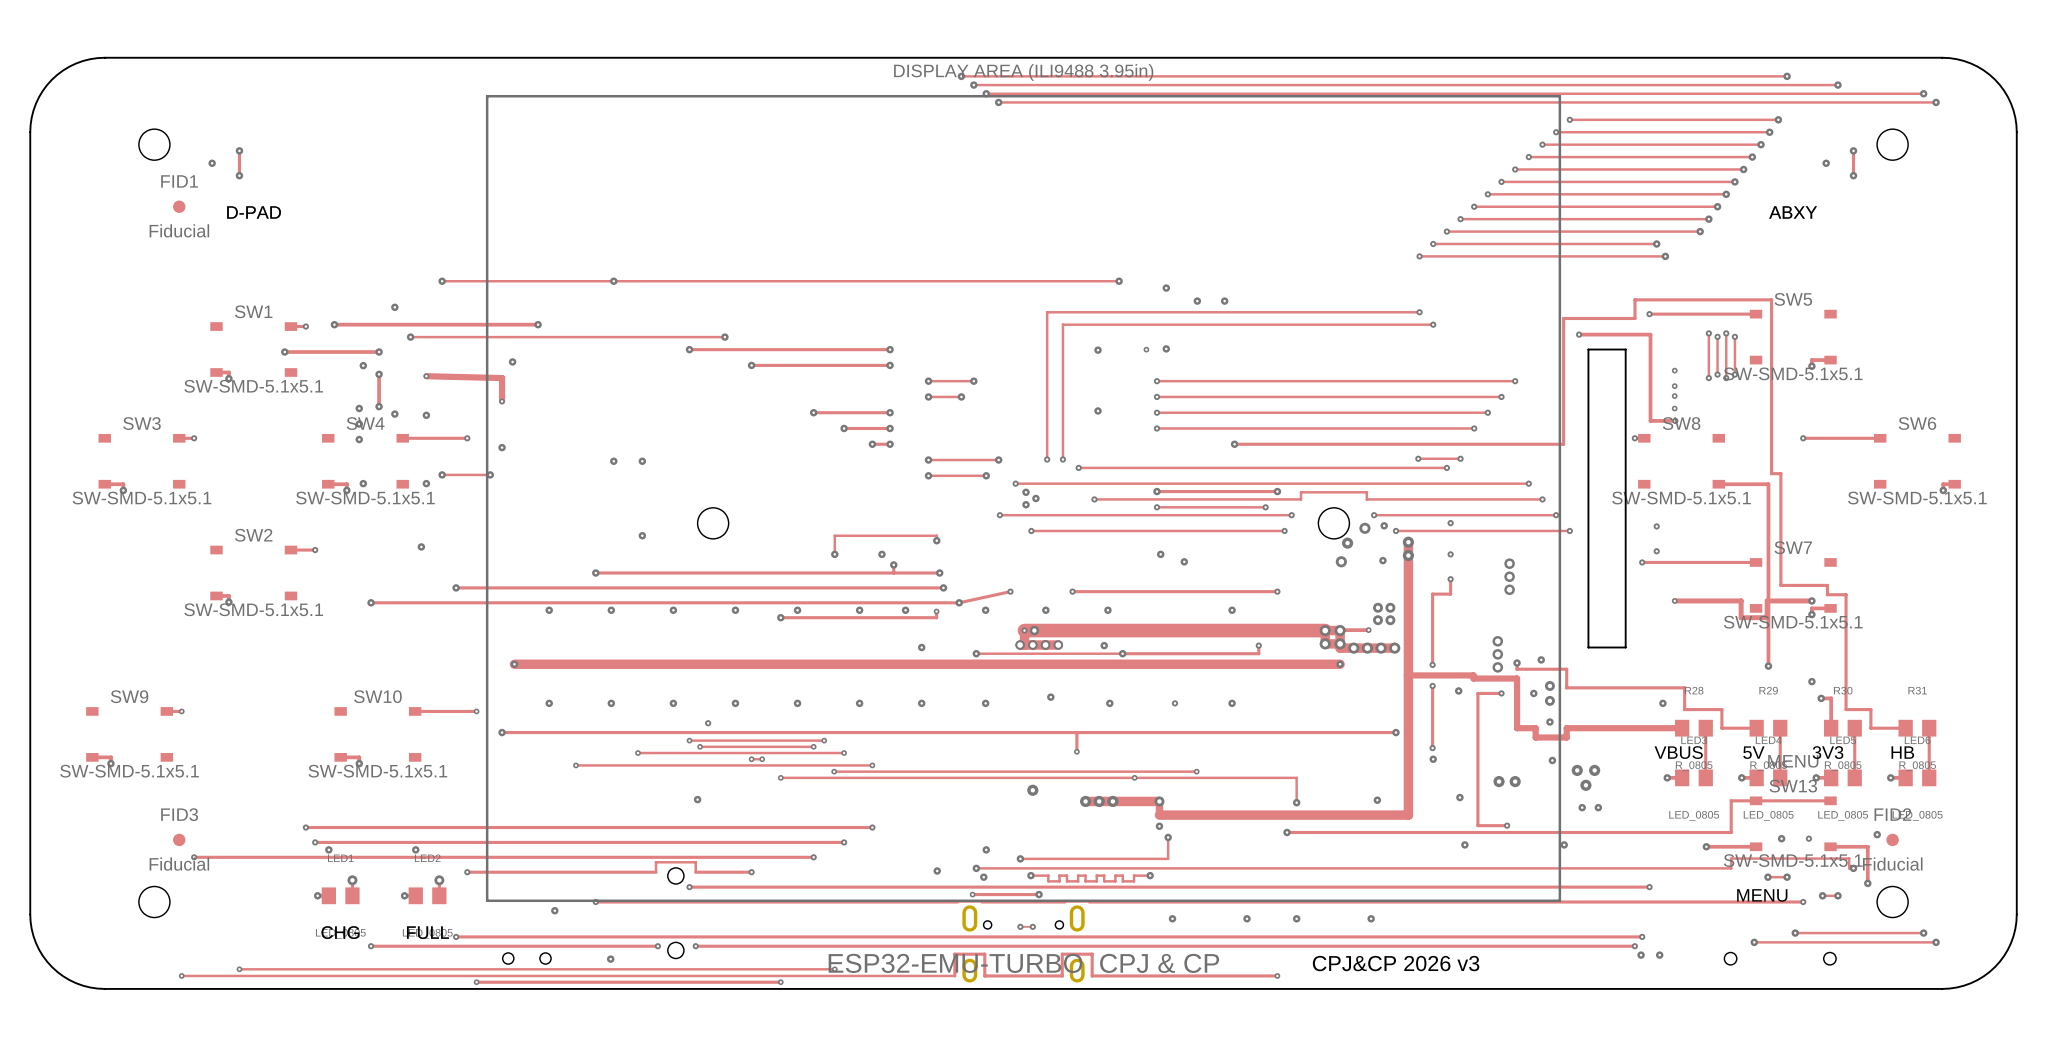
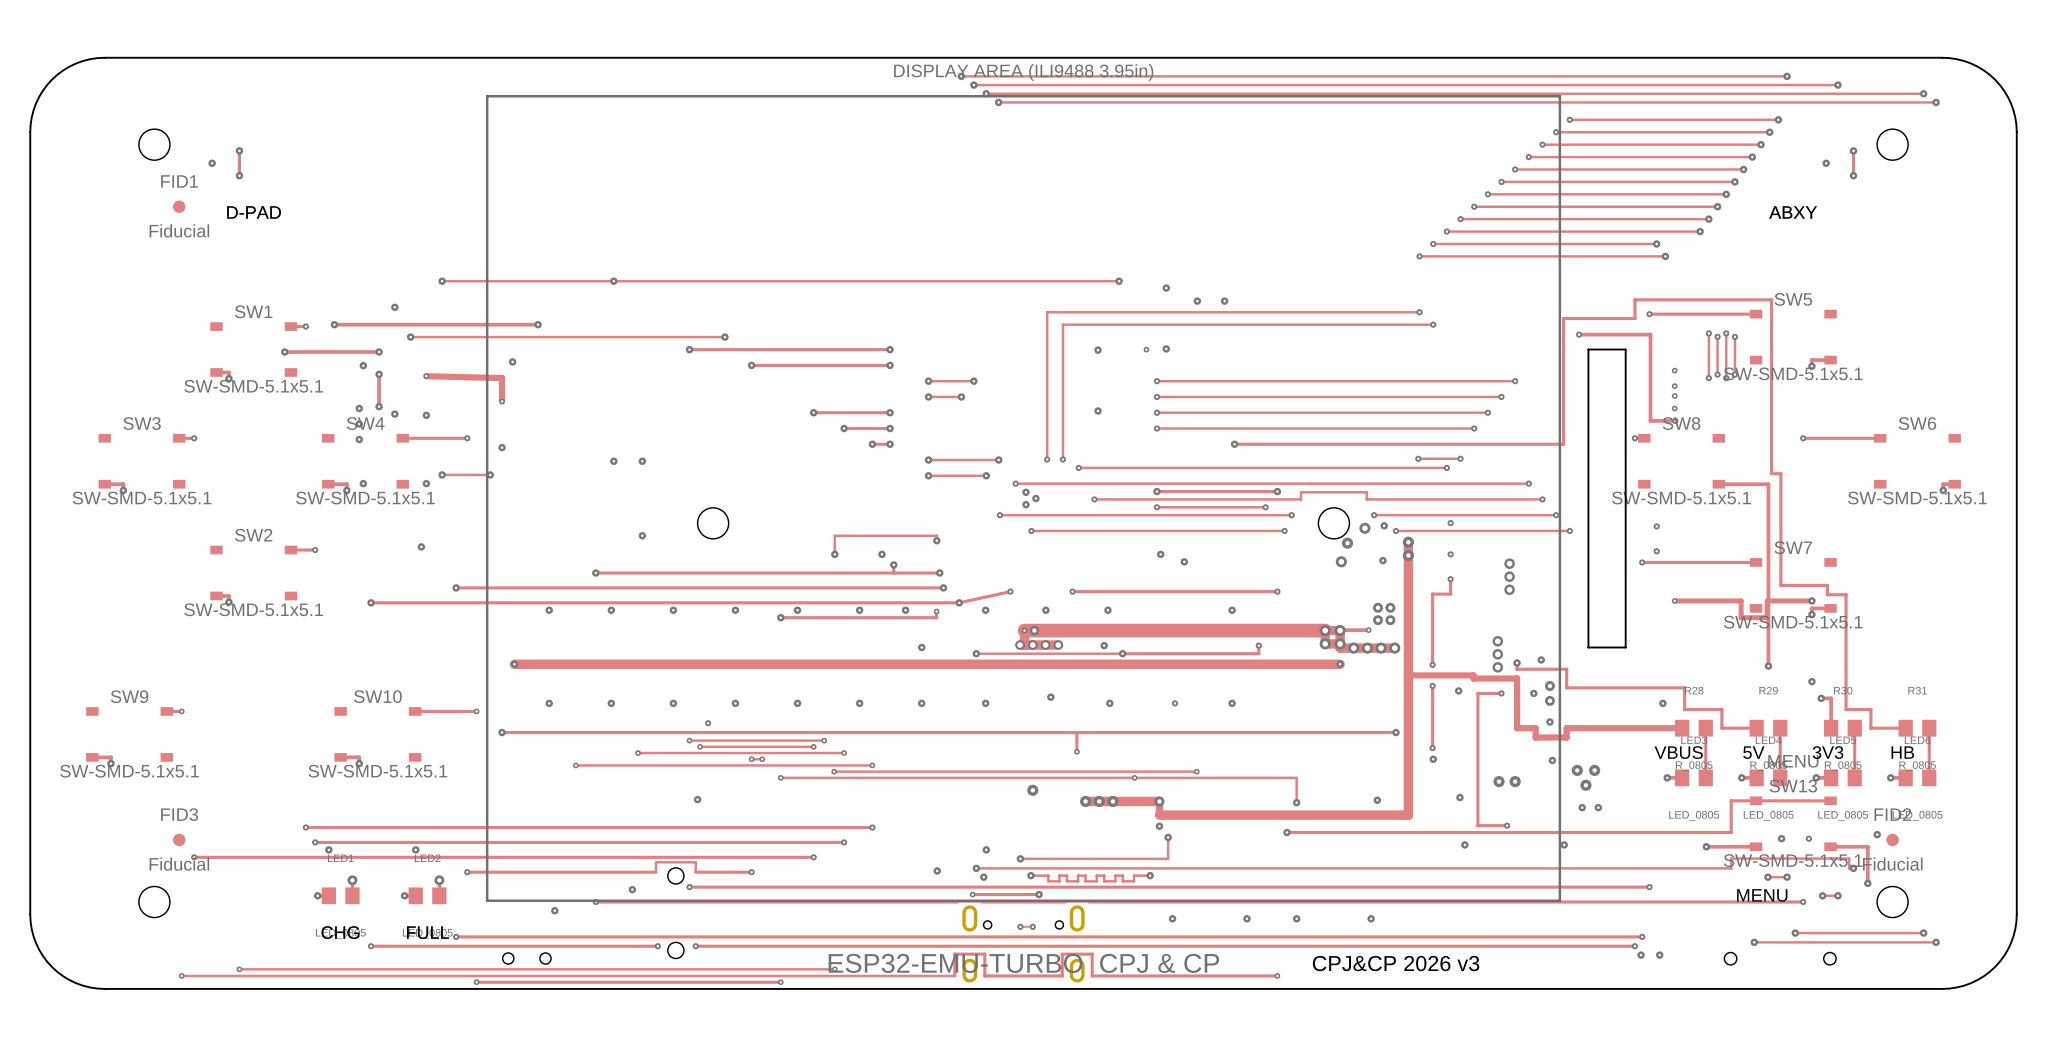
via position: (610, 959) -> (632, 889)

